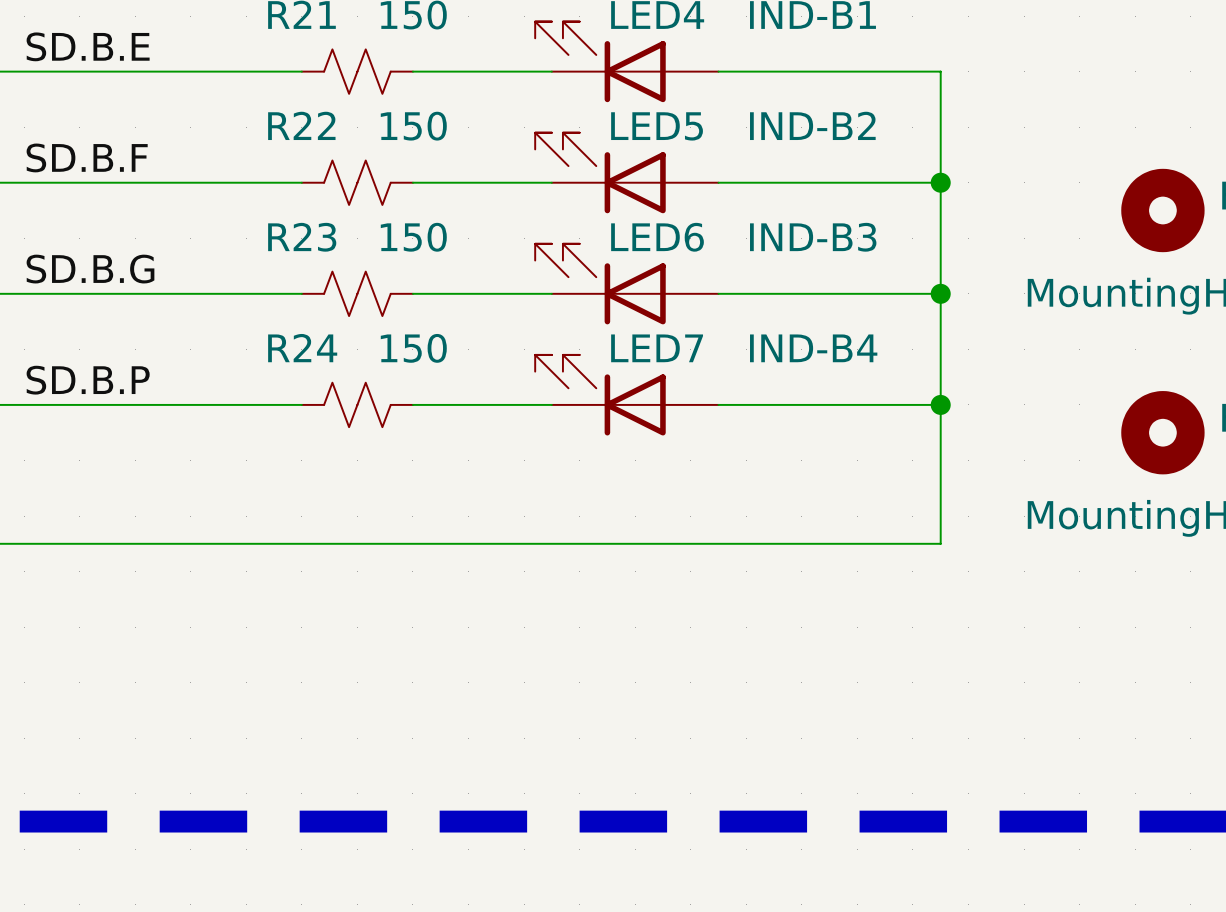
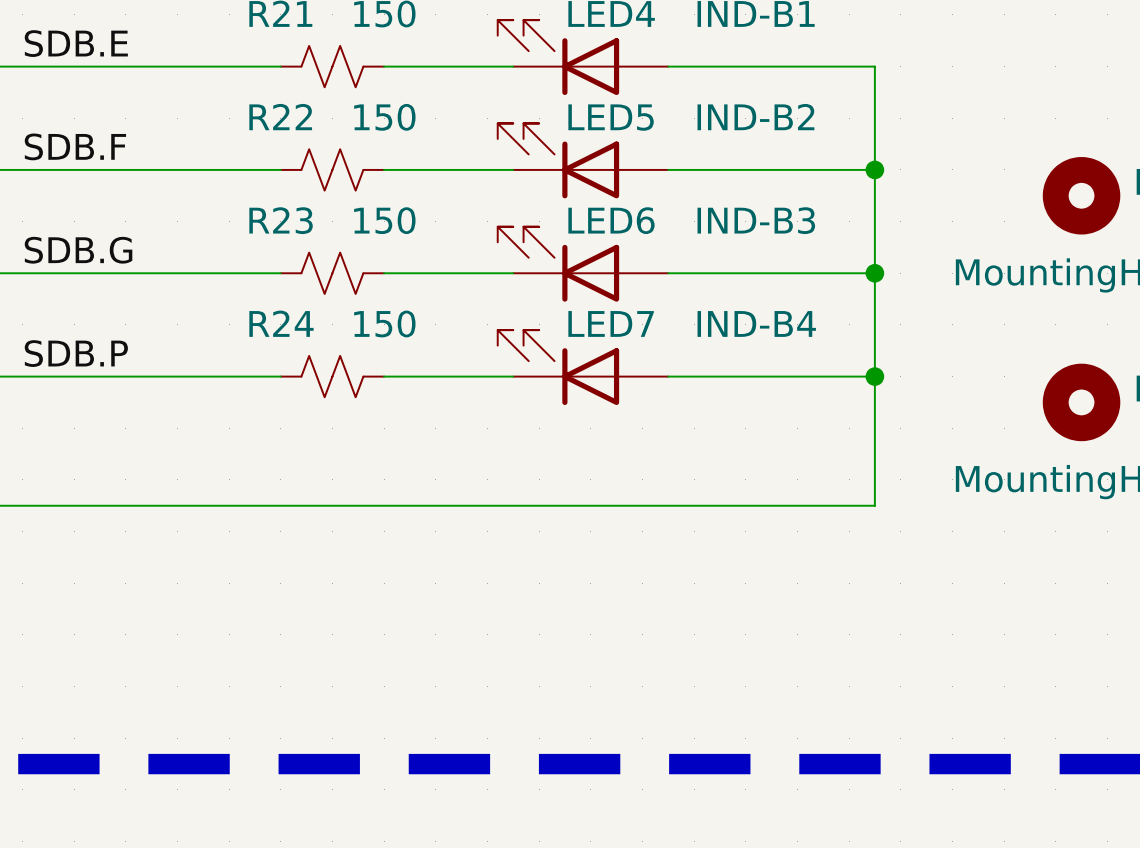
label: SD.B.E (88, 46) -> SDB.E (76, 43)
label: SD.B.F (87, 157) -> SDB.F (75, 146)
label: SD.B.G (90, 269) -> SDB.G (78, 250)
label: SD.B.P (88, 380) -> SDB.P (76, 353)

